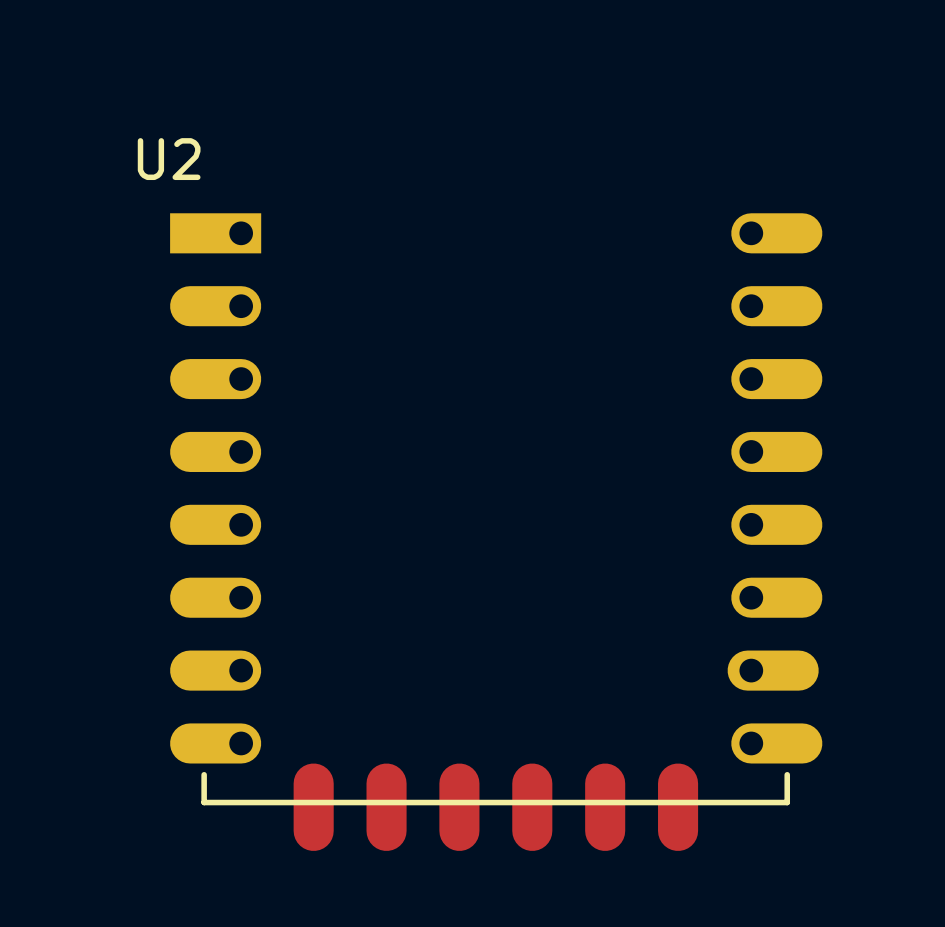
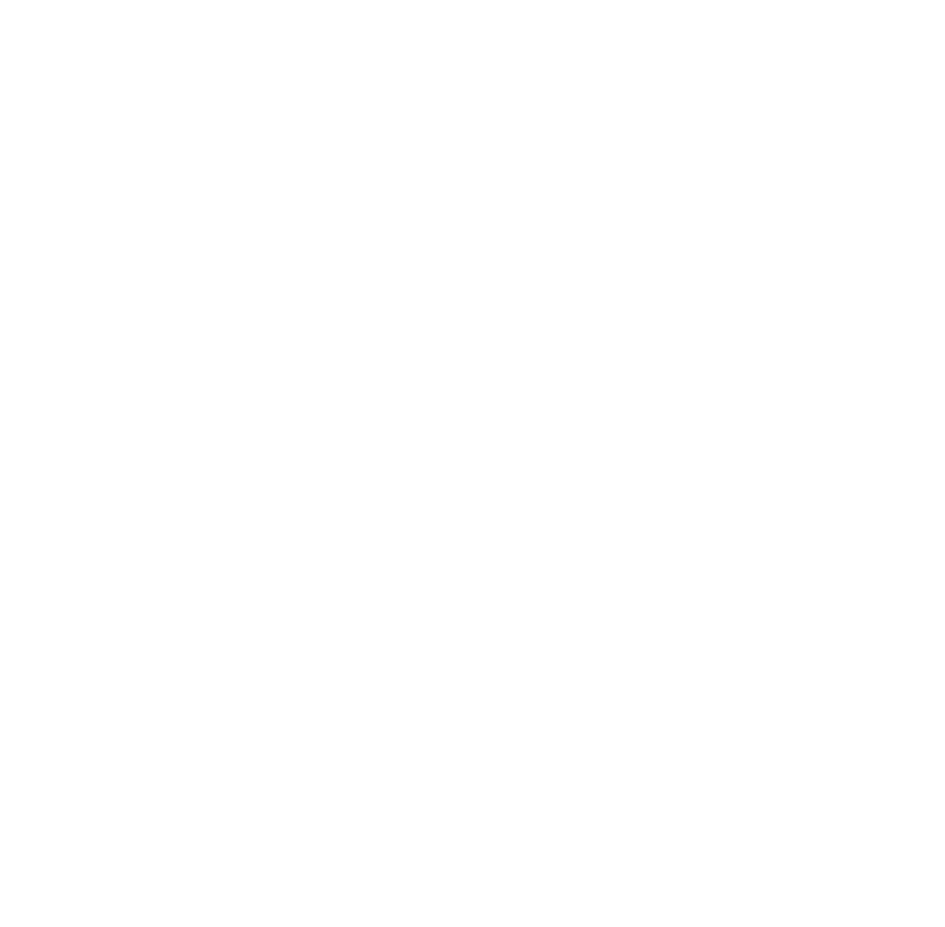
U2: (496, 532) -> none

